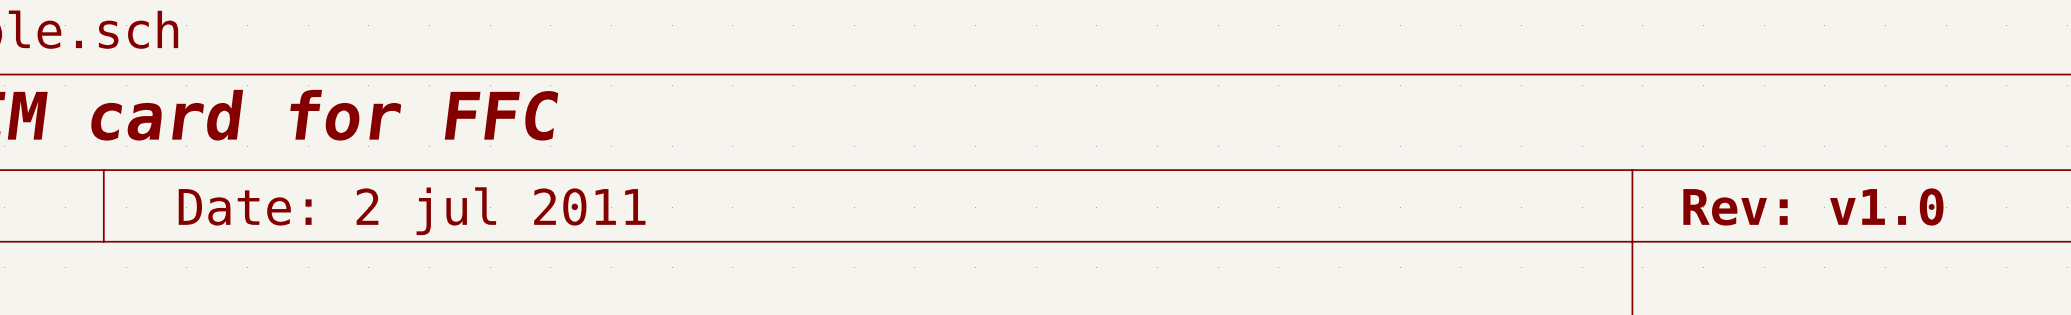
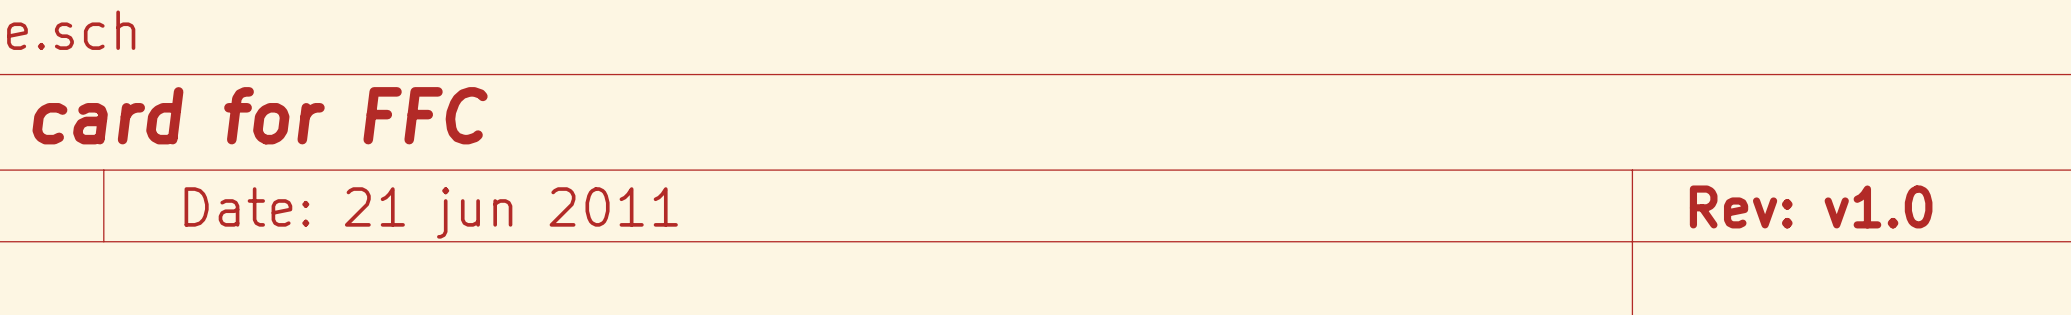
title block: Date: 2 jul 2011 (412, 211) -> Date: 21 jun 2011 (431, 212)

